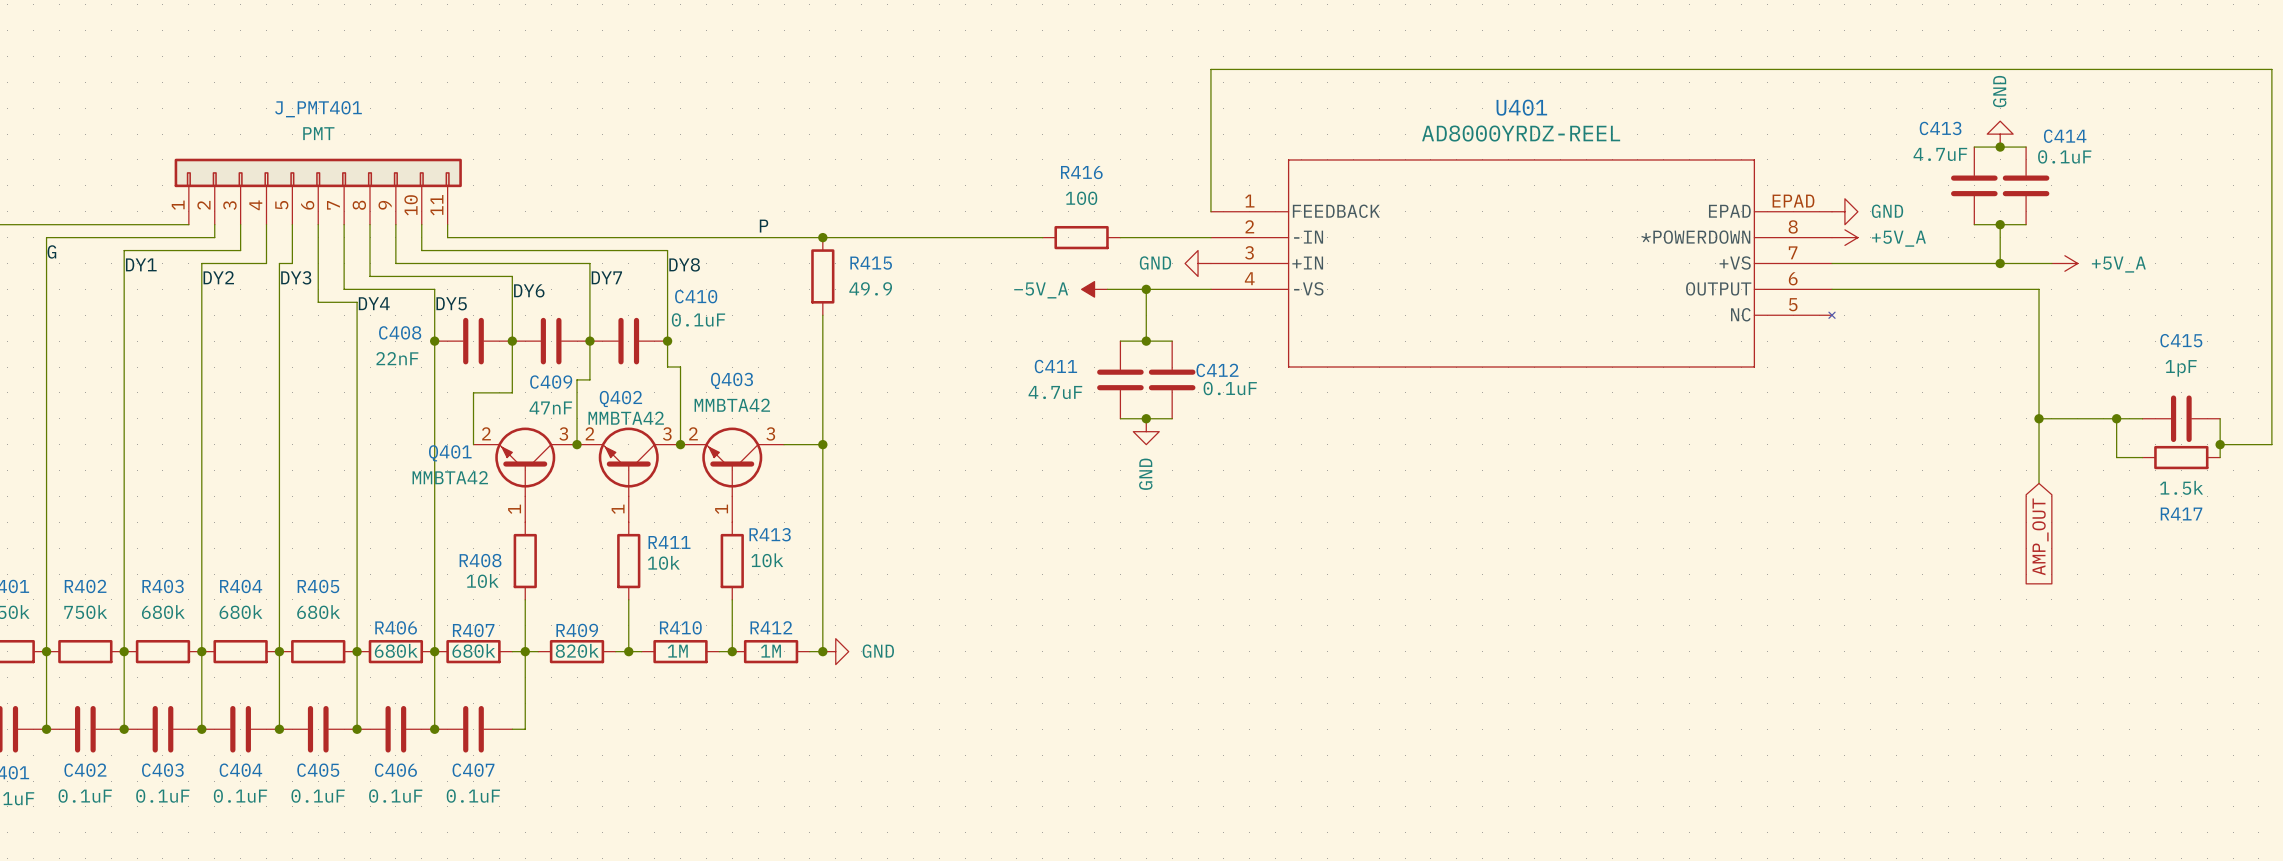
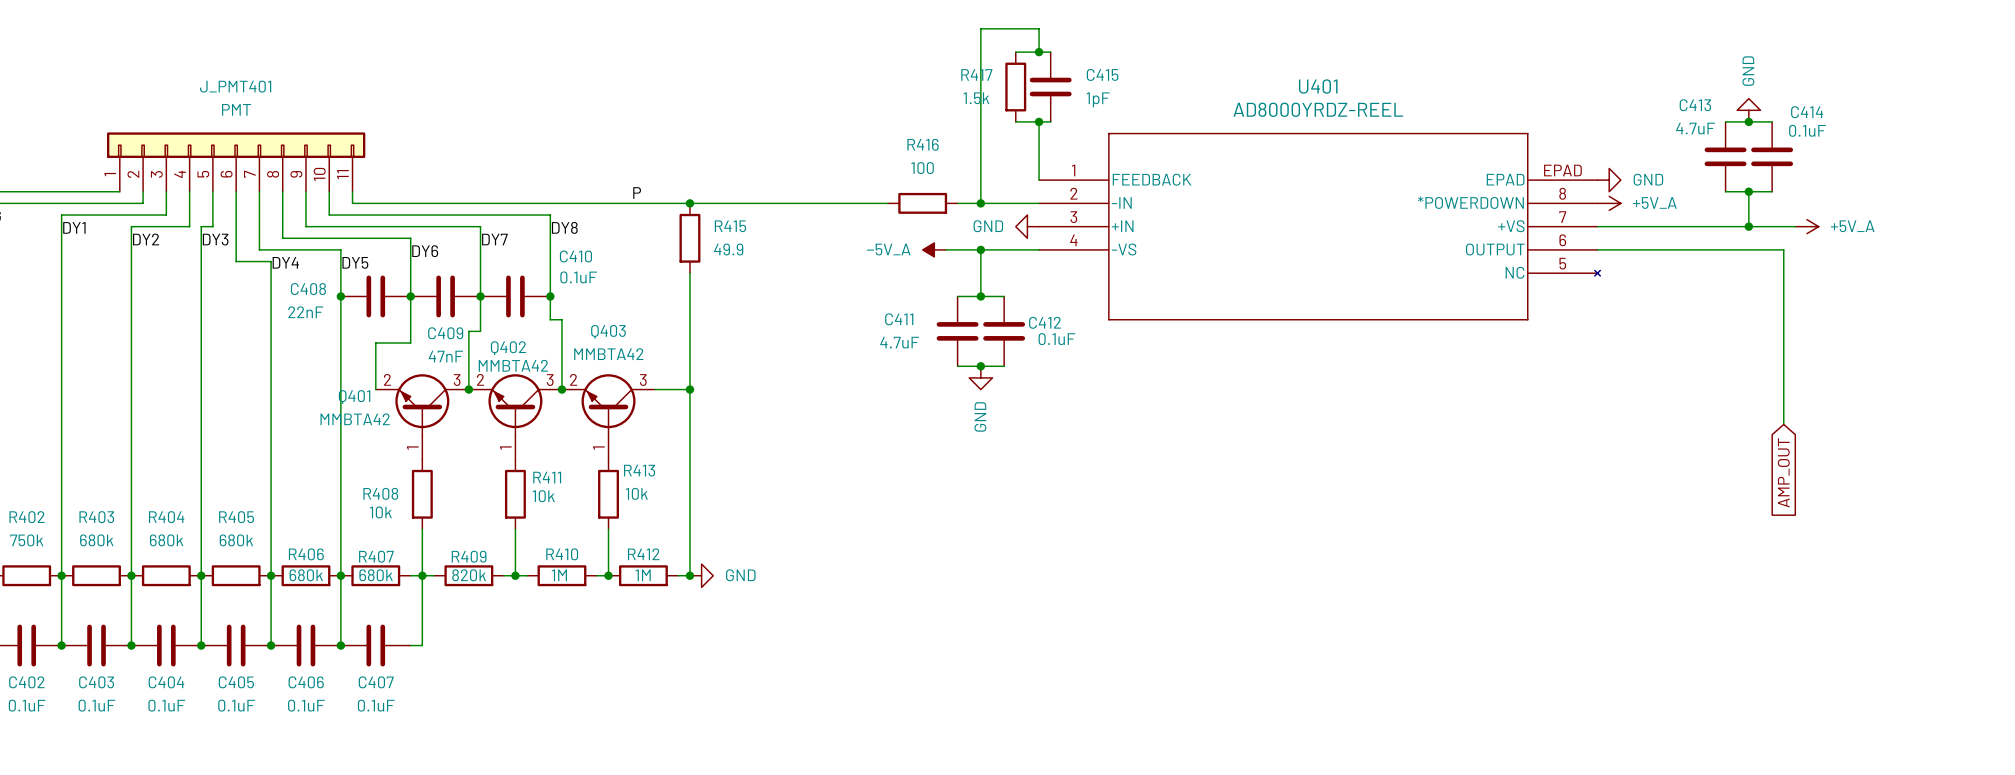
wire: none -> (1015, 52) (1039, 52) (1039, 28) (980, 28) (980, 203)
wire: (1210, 69) (1210, 147) -> none
junction: none -> (1039, 52)
wire: (1223, 69) (2271, 69) (2271, 444) (2220, 444) -> none
wire: none -> (1015, 121) (1050, 121)
junction: none -> (1039, 121)
junction: none -> (980, 203)
wire: (2039, 418) (2142, 418) -> none
junction: (2039, 418) -> none
wire: (2116, 418) (2116, 457) (2142, 457) -> none
junction: (2116, 418) -> none
C415 rotation: 0° (2181, 418) -> 90° clockwise (1050, 87)
C415 position: (2181, 418) -> (1050, 87)
wire: (2220, 418) (2220, 457) -> none
junction: (2220, 444) -> none
R417 rotation: 0° (2181, 457) -> 90° clockwise (1015, 87)
R417 position: (2181, 457) -> (1015, 87)

